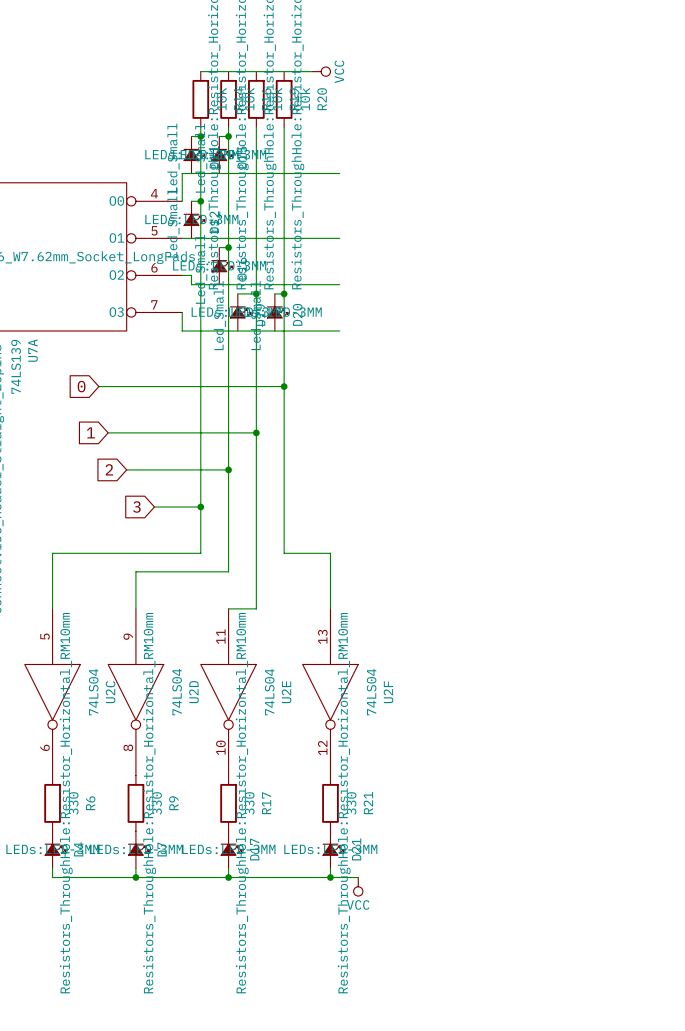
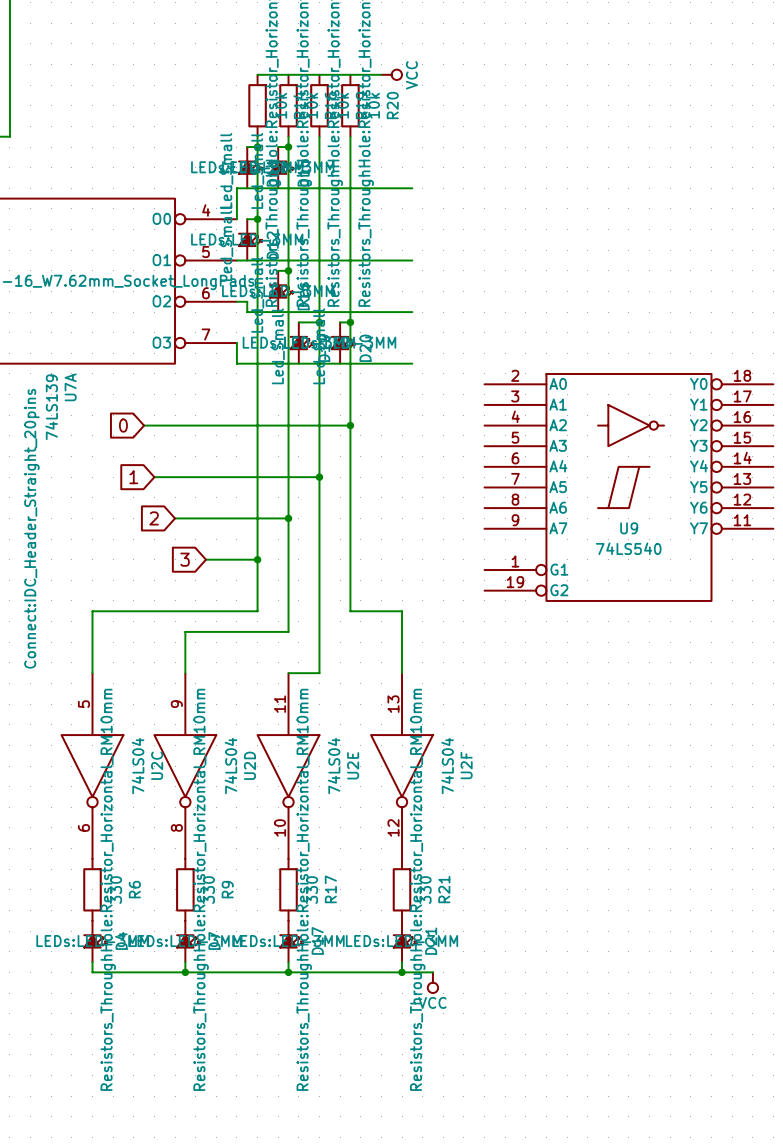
U9: none -> 74LS540 (628, 487)

